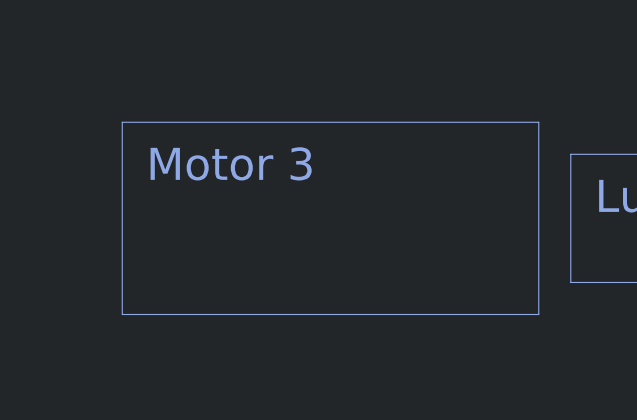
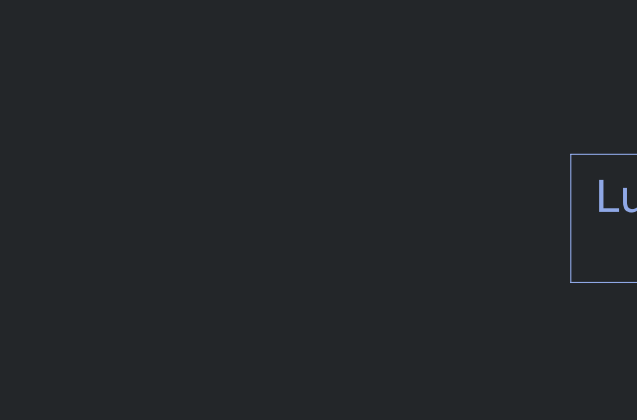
line: (122, 122) (538, 122) (538, 314) (122, 314) (122, 122) -> none
text: Motor 3 (231, 163) -> none

